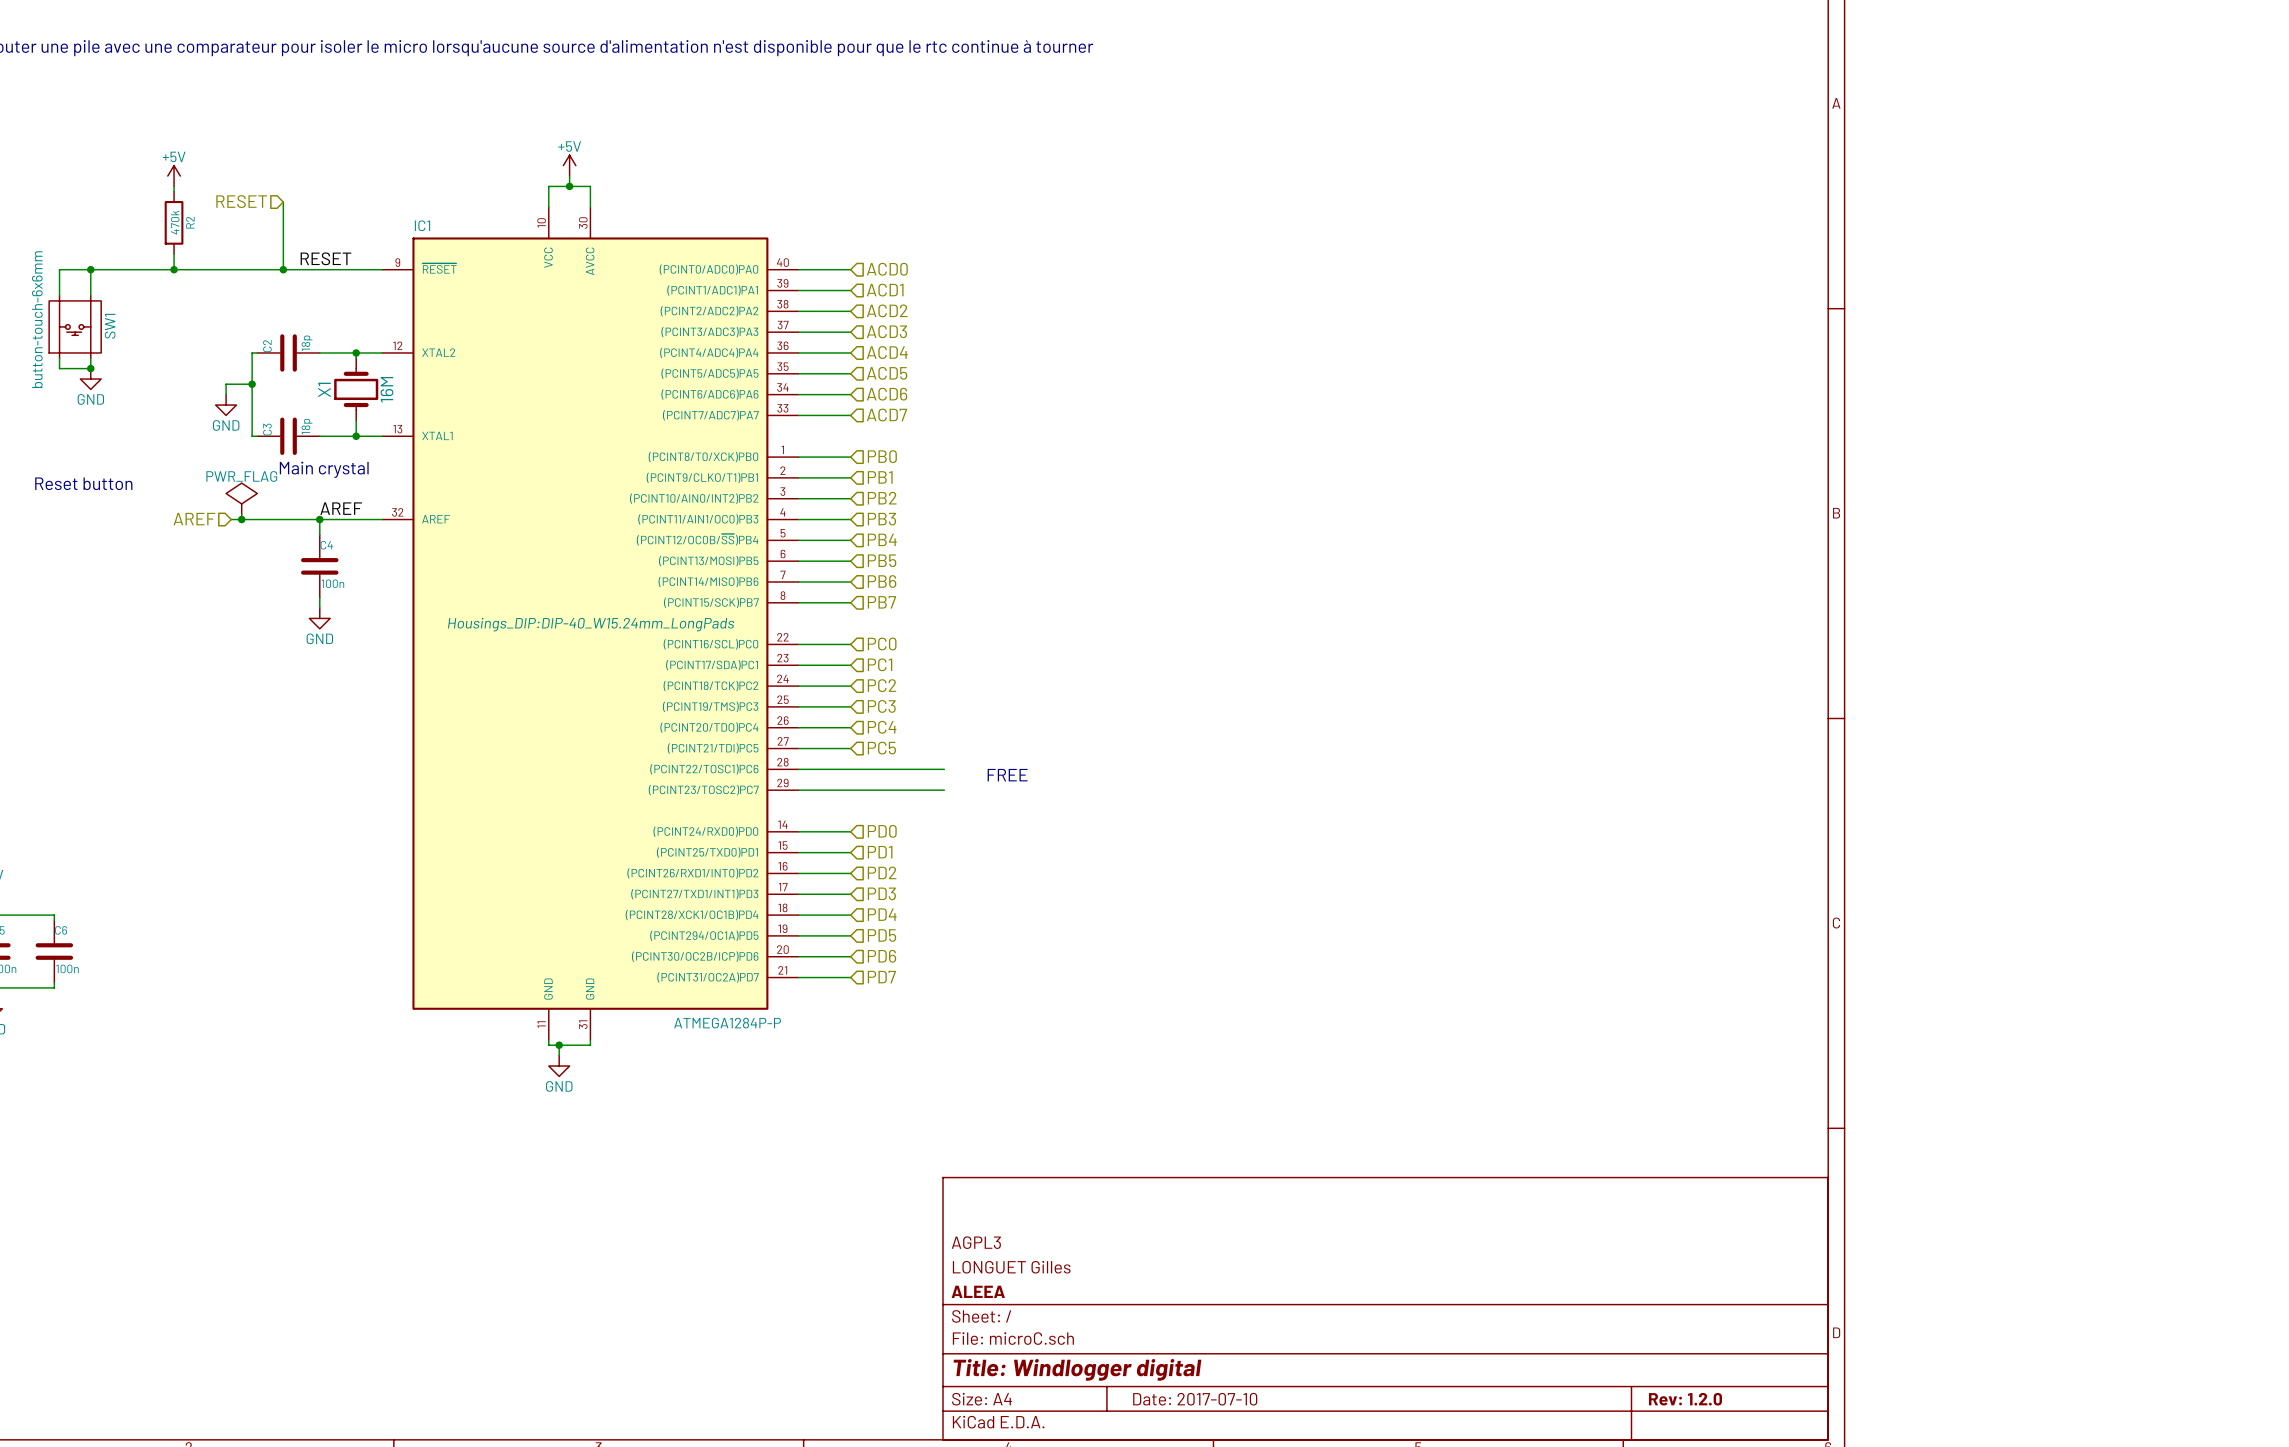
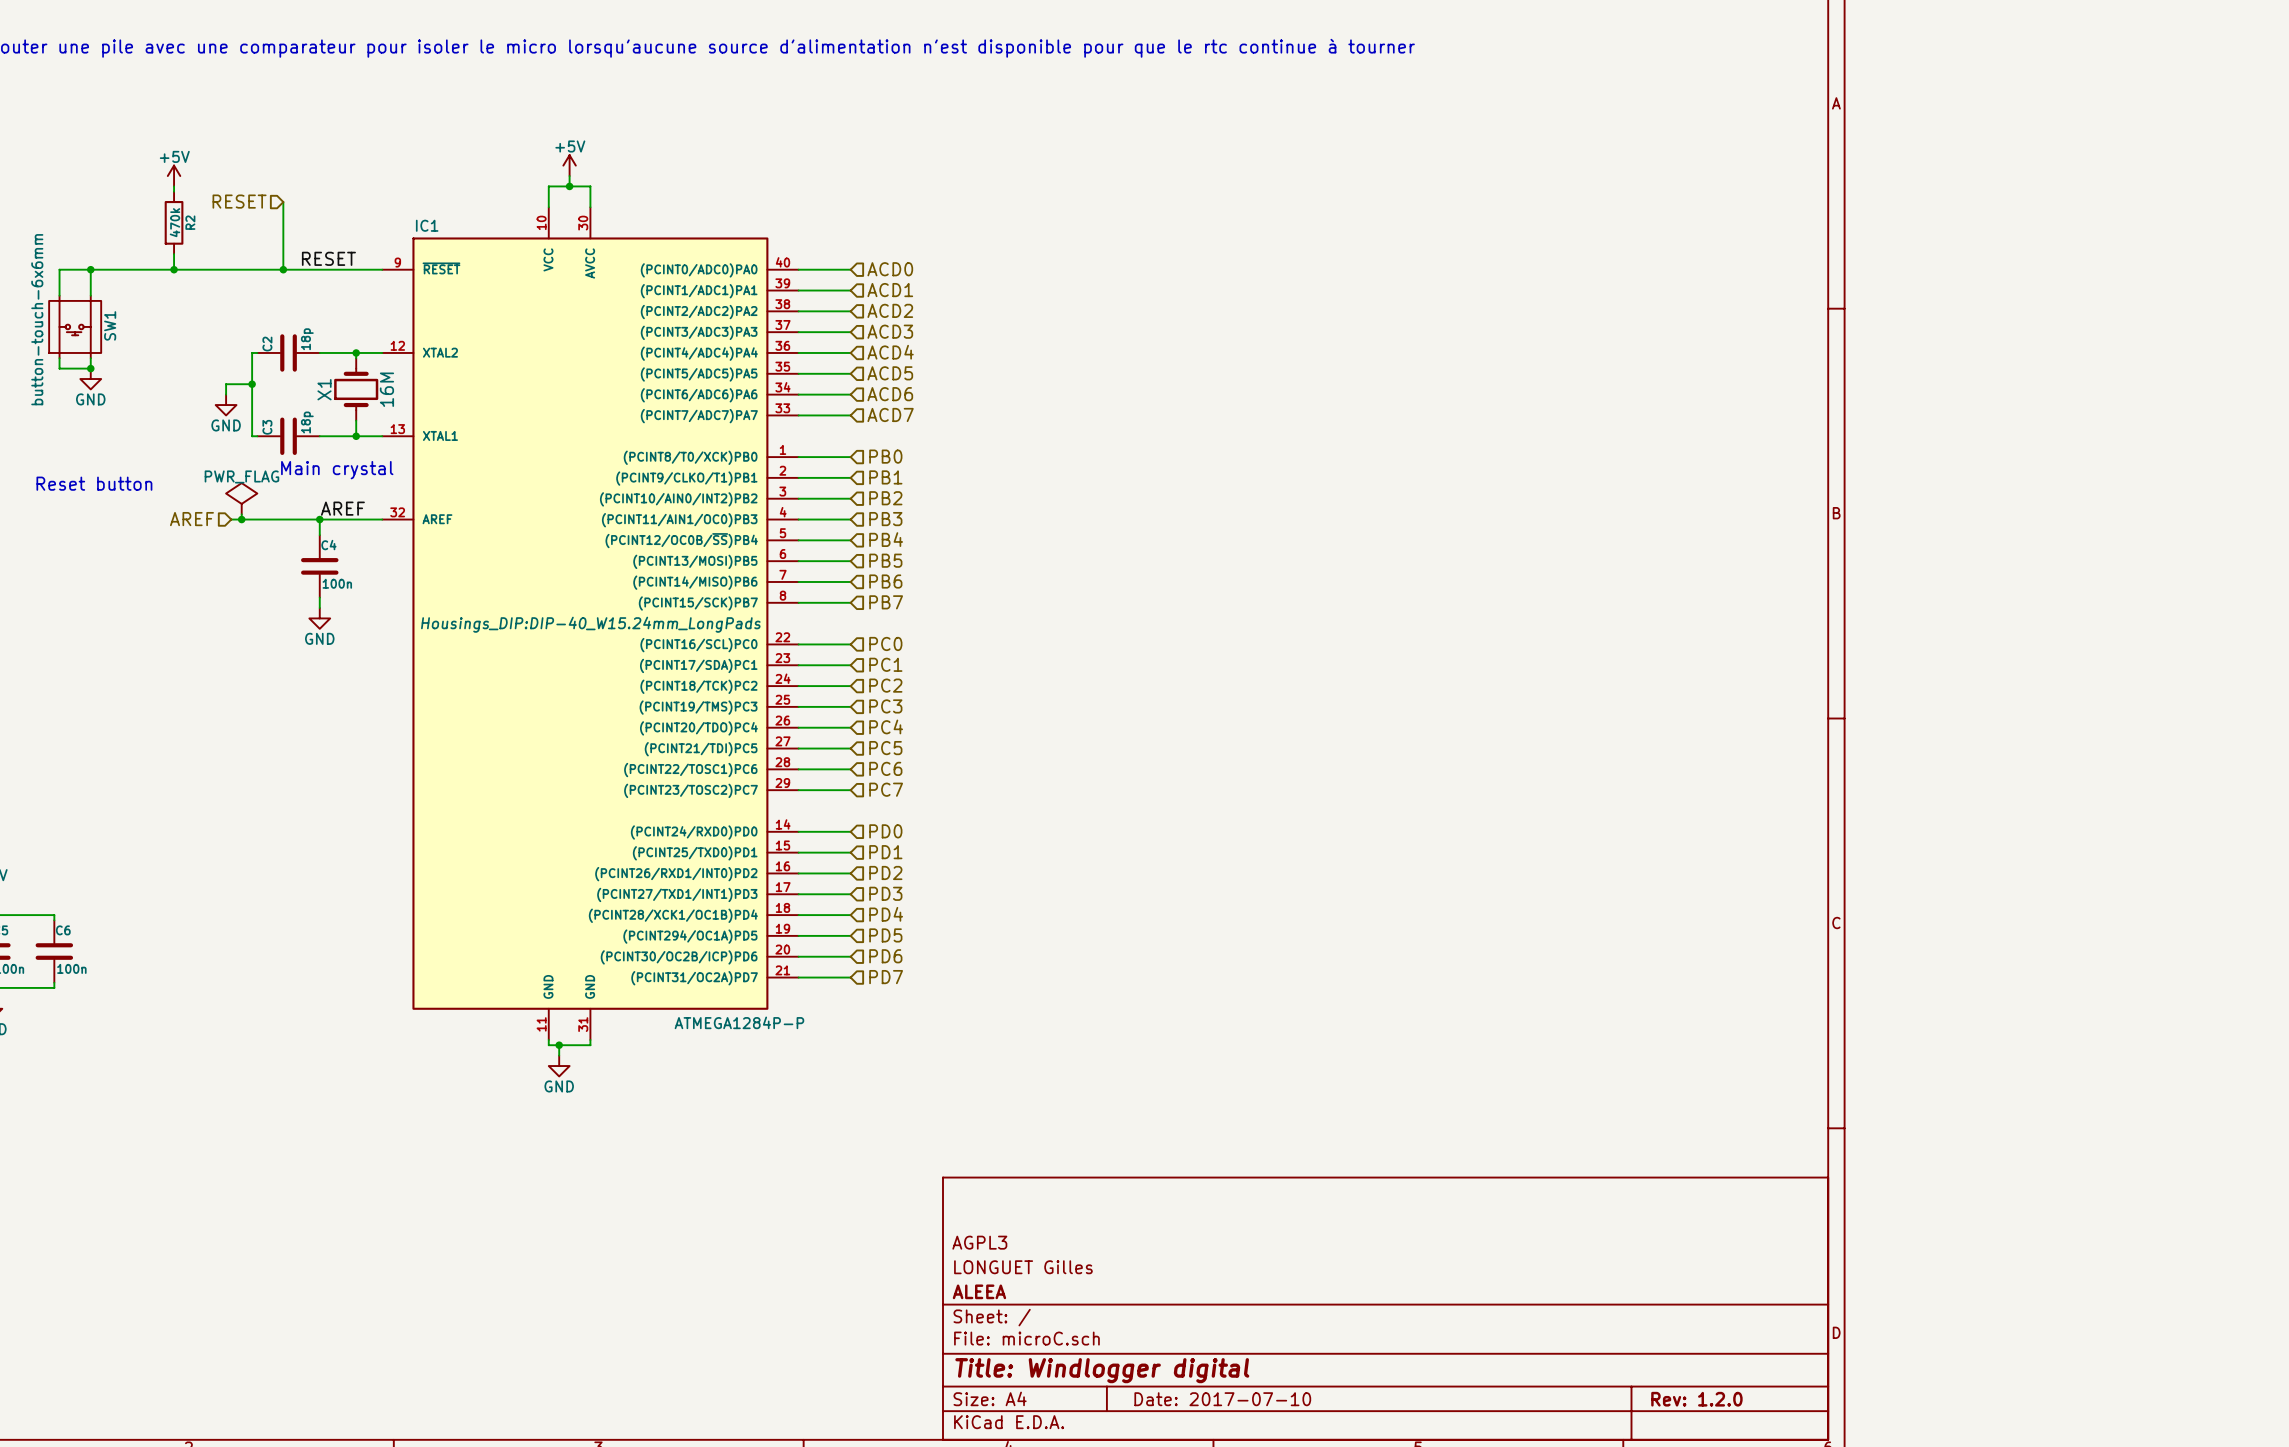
hierarchical label: none -> PC6 (885, 768)
wire: (850, 769) (944, 769) -> none
text: FREE (1007, 775) -> none
hierarchical label: none -> PC7 (886, 789)
wire: (850, 790) (944, 790) -> none

